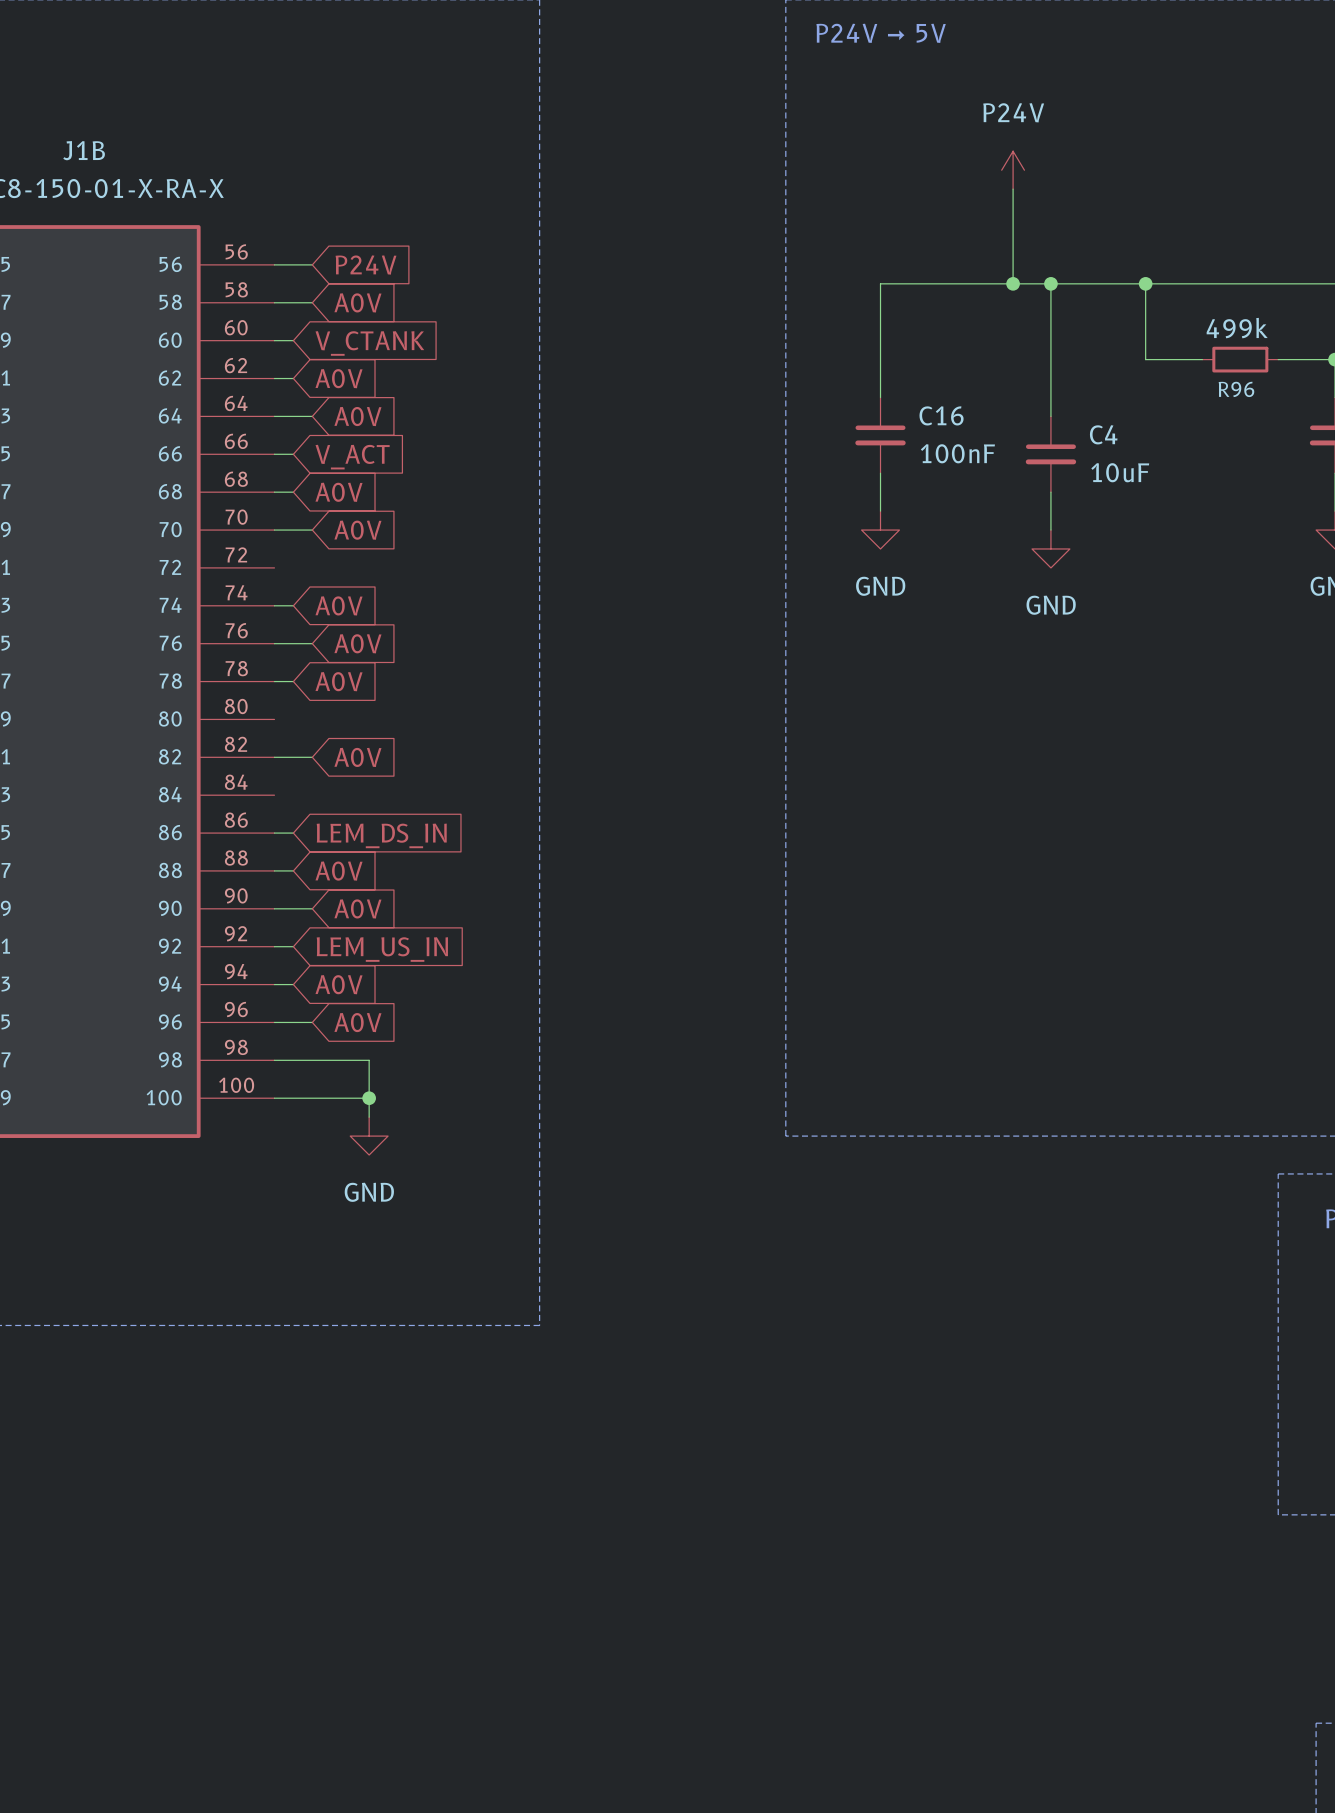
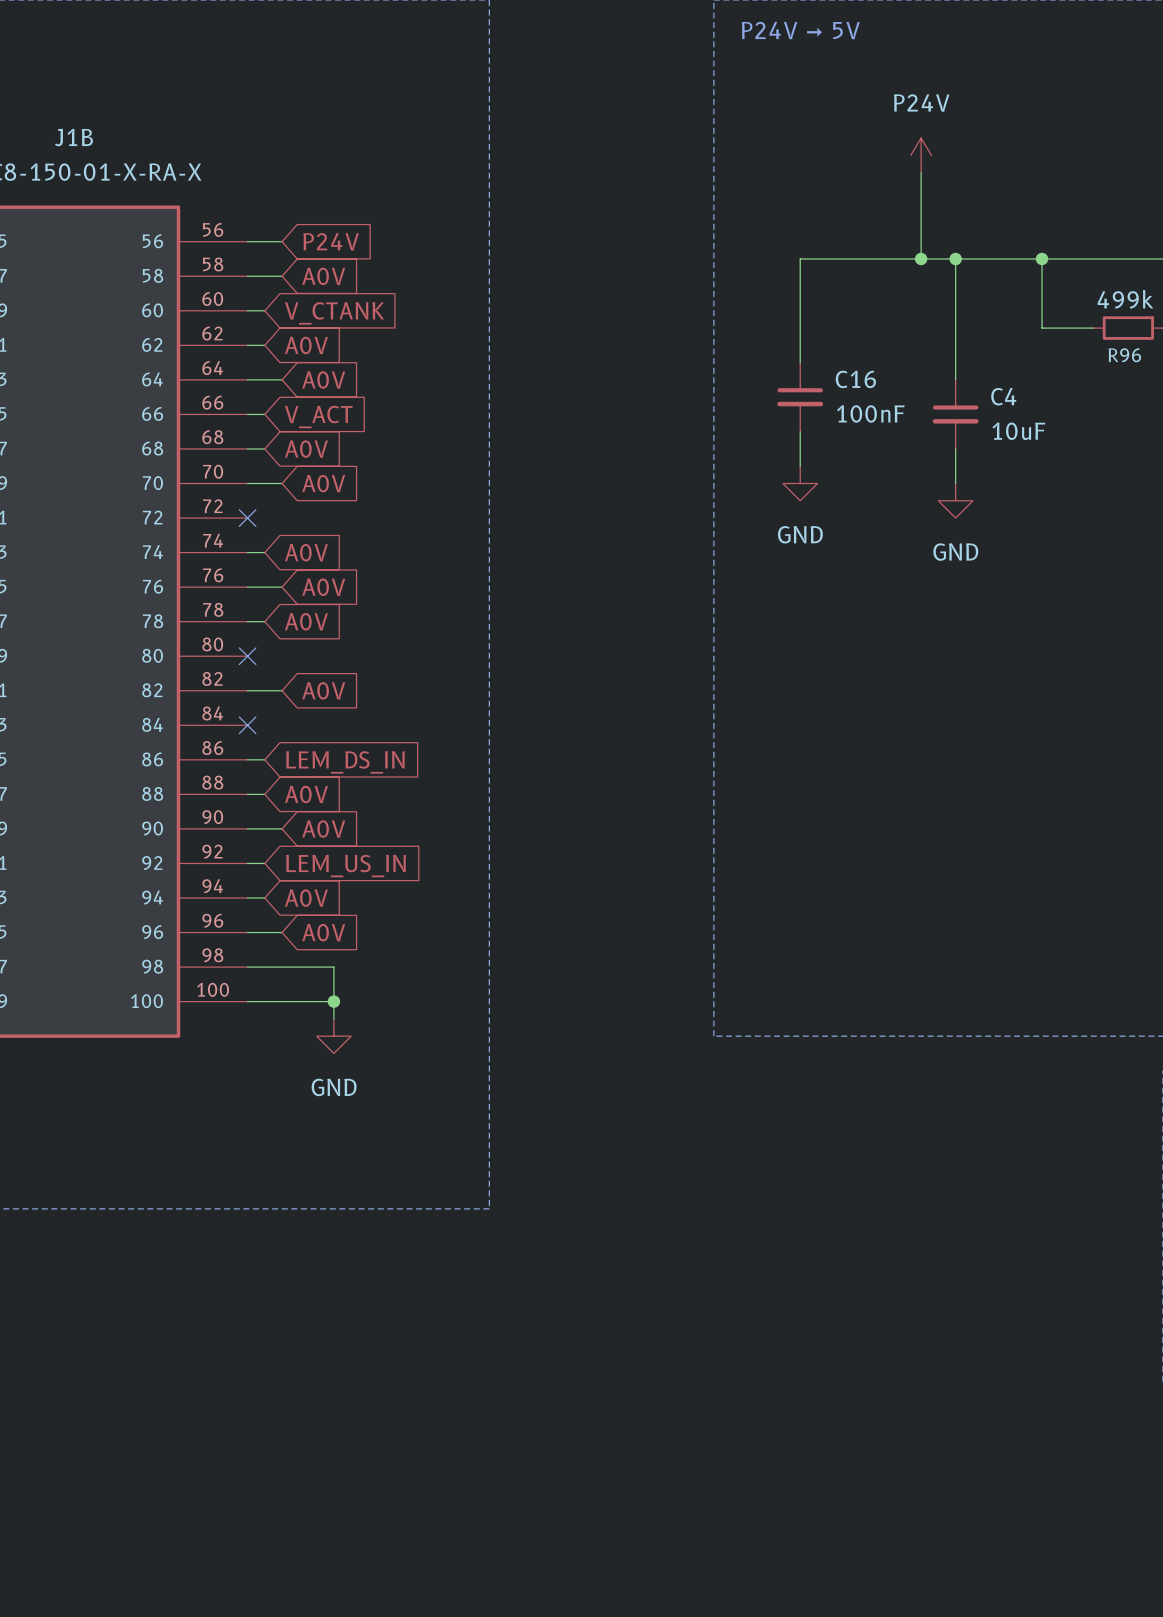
no-connect mark: none -> (247, 518)
no-connect mark: none -> (247, 656)
no-connect mark: none -> (247, 725)

